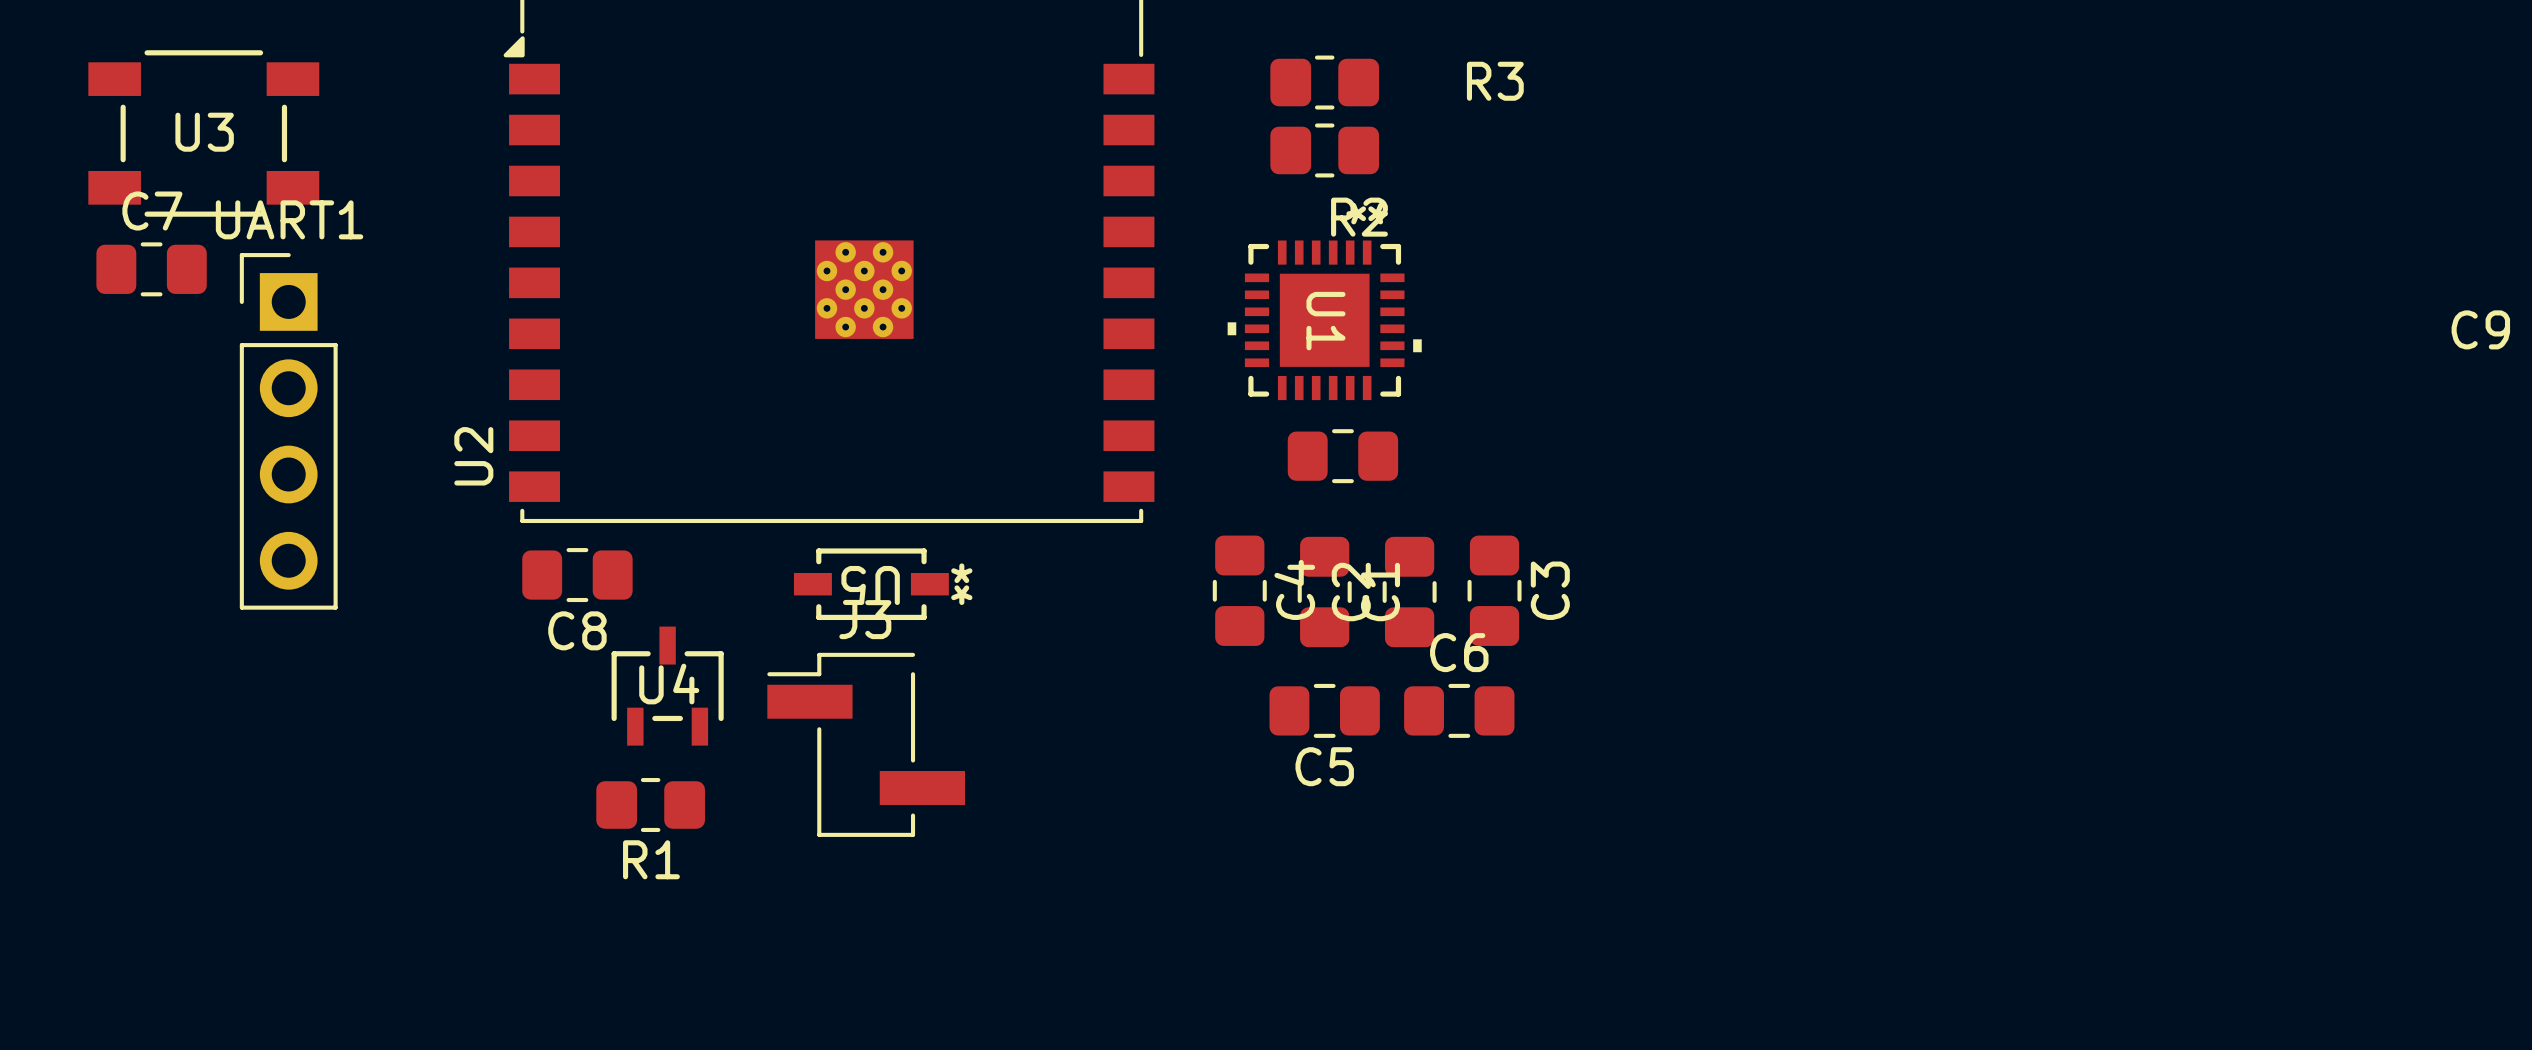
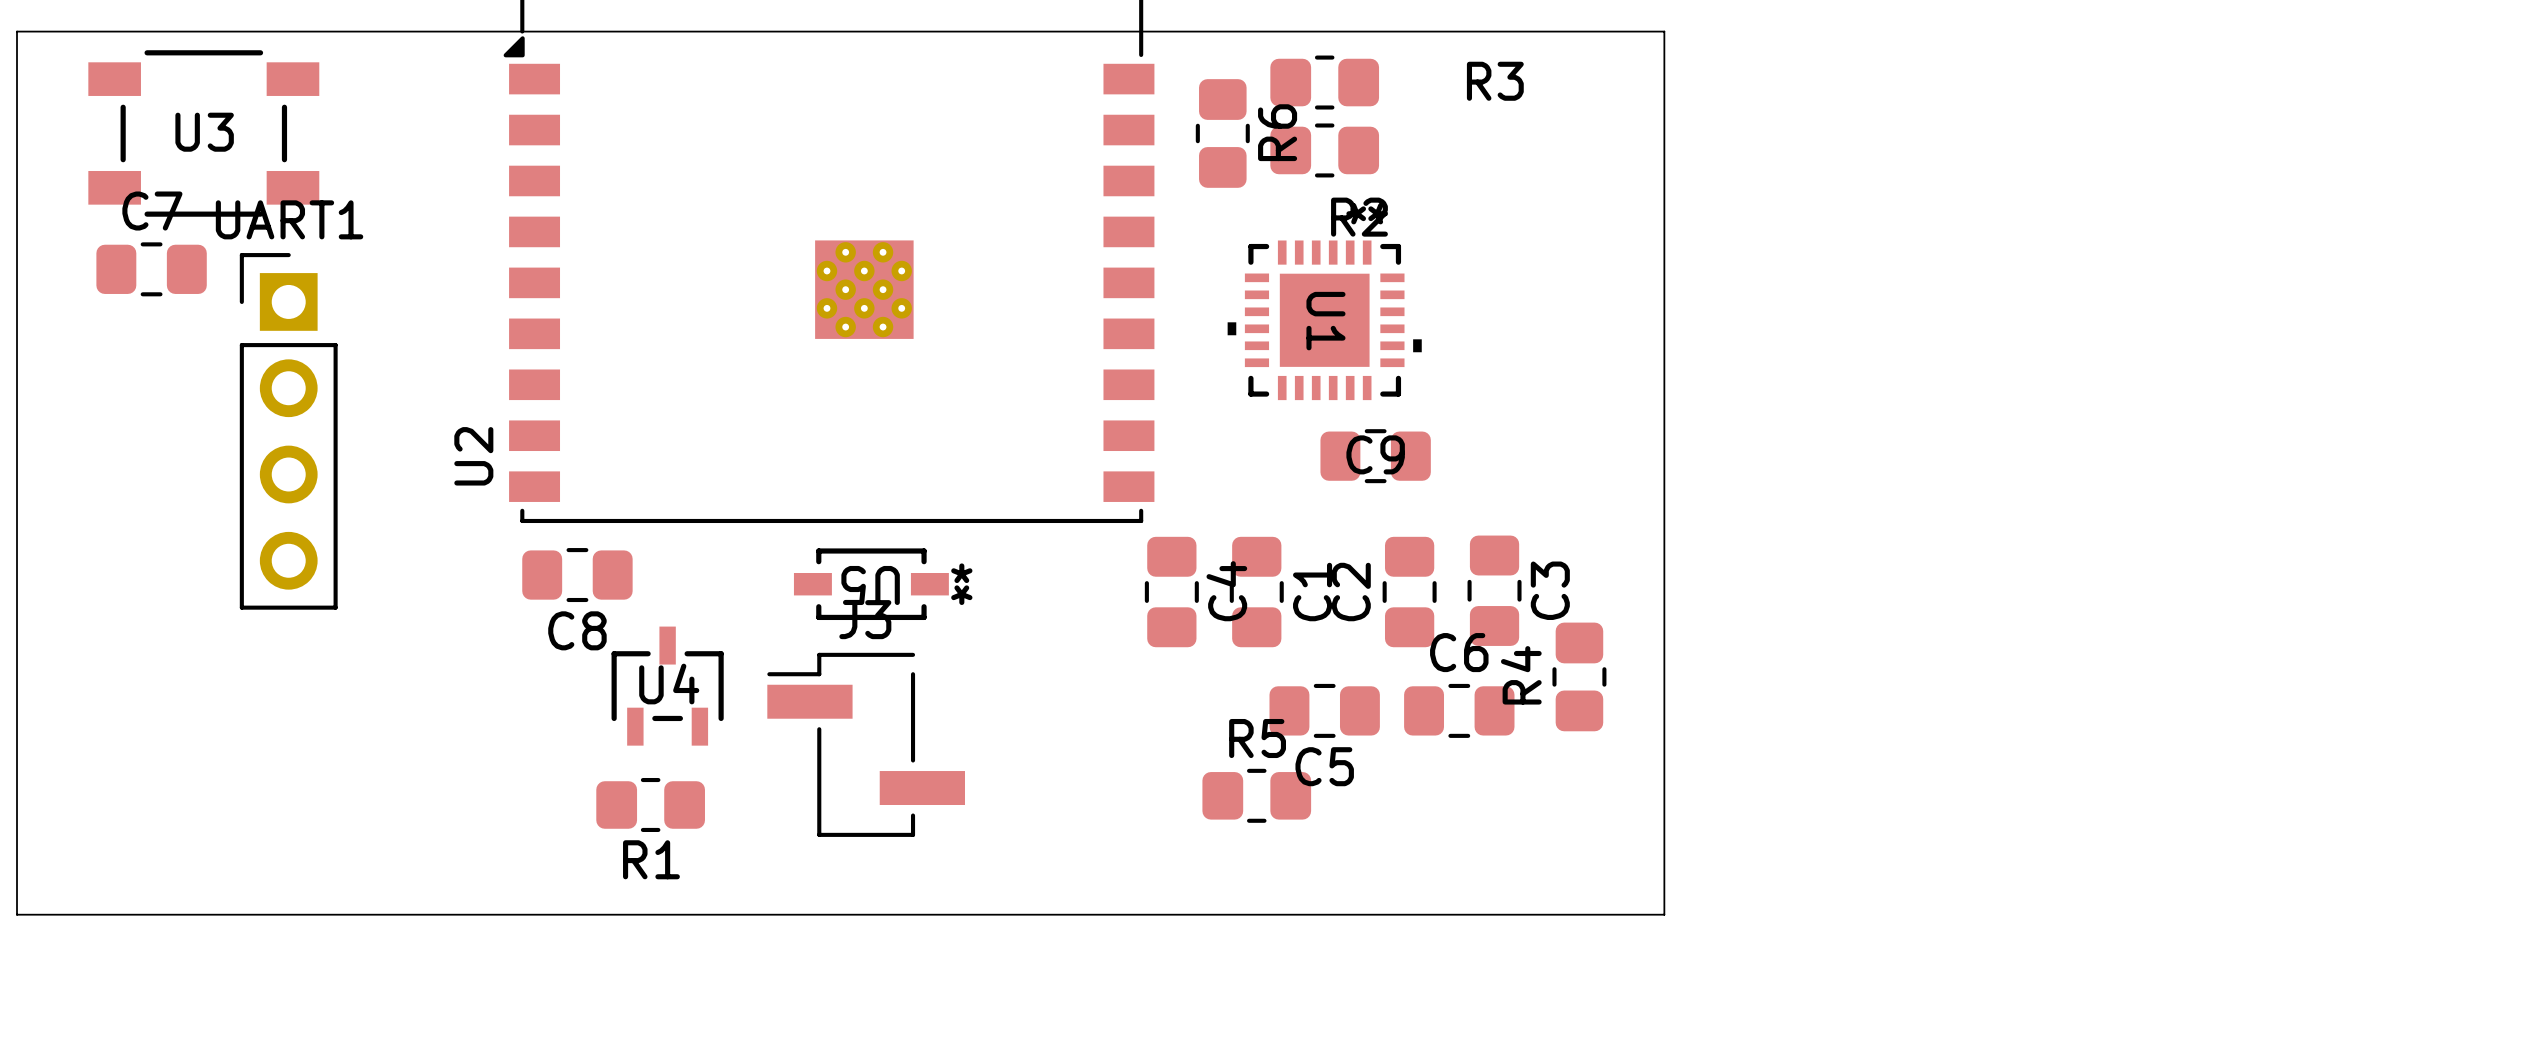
board edge: none -> (17, 31) (1664, 31) (1664, 914) (17, 914) (17, 31)
R6: none -> (1222, 133)
C9 name position: C9 (2480, 329) -> C9 (1375, 454)
C9 position: (1342, 456) -> (1375, 456)
C4 position: (1239, 590) -> (1171, 592)
C1 position: (1324, 592) -> (1256, 592)
R4: none -> (1579, 676)
R5: none -> (1256, 795)

